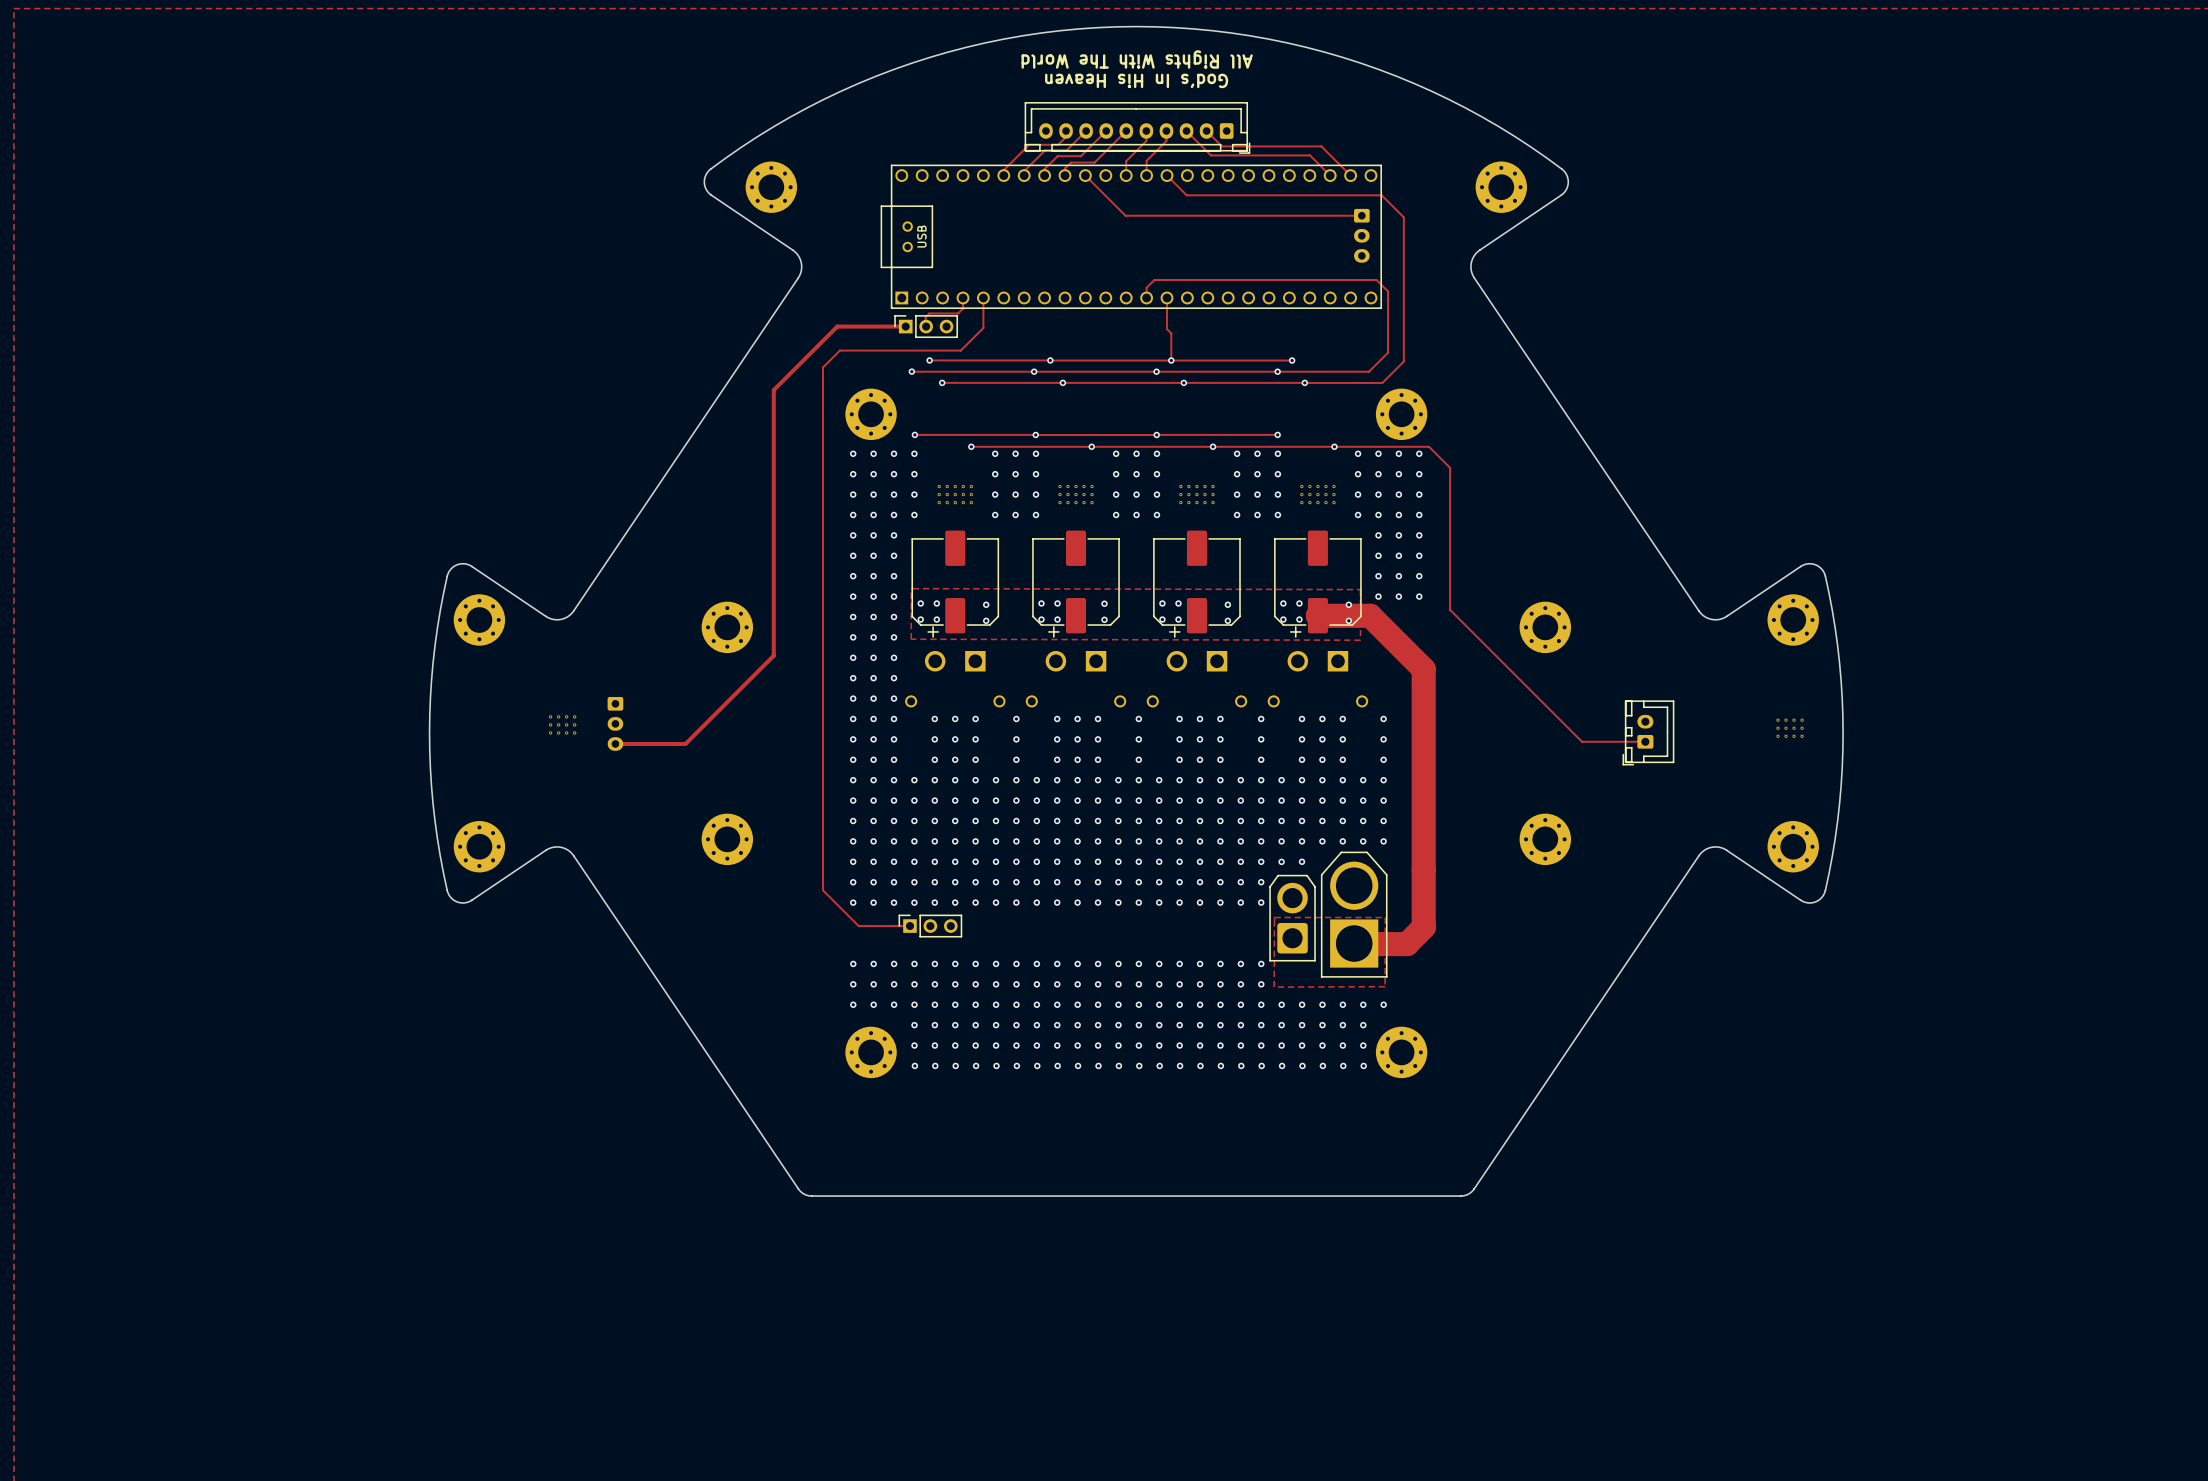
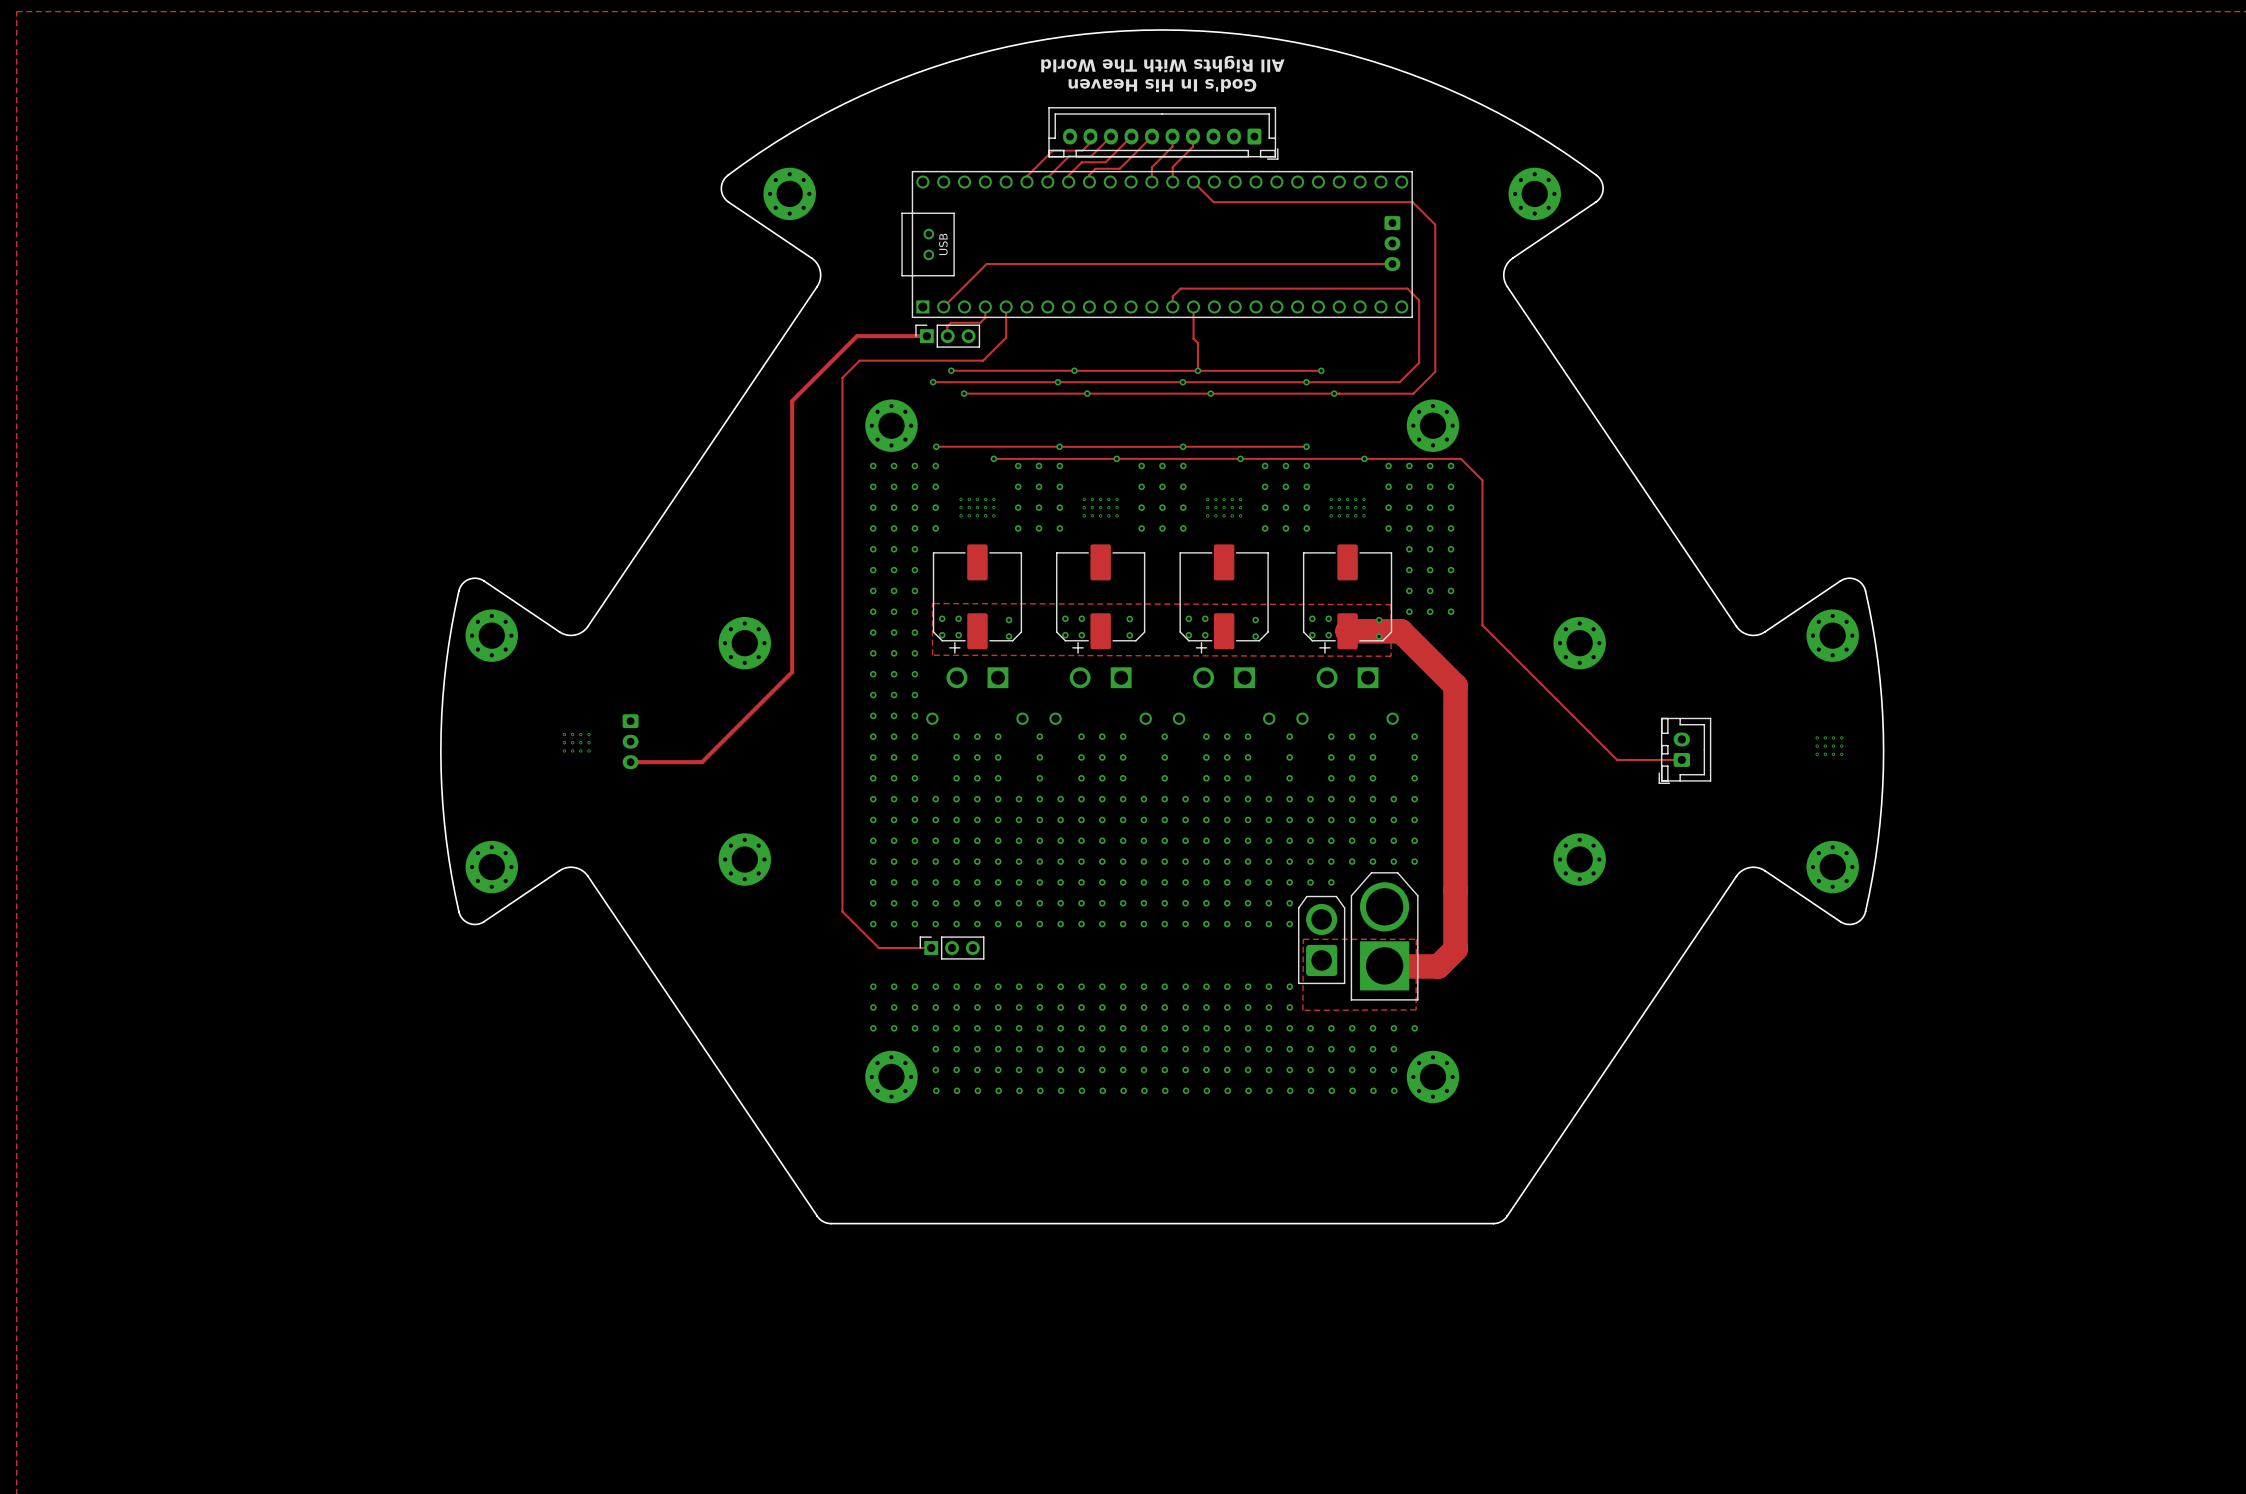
track: (1186, 131) (1210, 155) (1310, 155) (1330, 175) -> none
track: (1206, 131) (1222, 146) (1321, 146) (1350, 175) -> none
track: (1085, 175) (1125, 215) (1361, 215) -> none
track: none -> (1392, 264) (986, 264) (943, 306)

